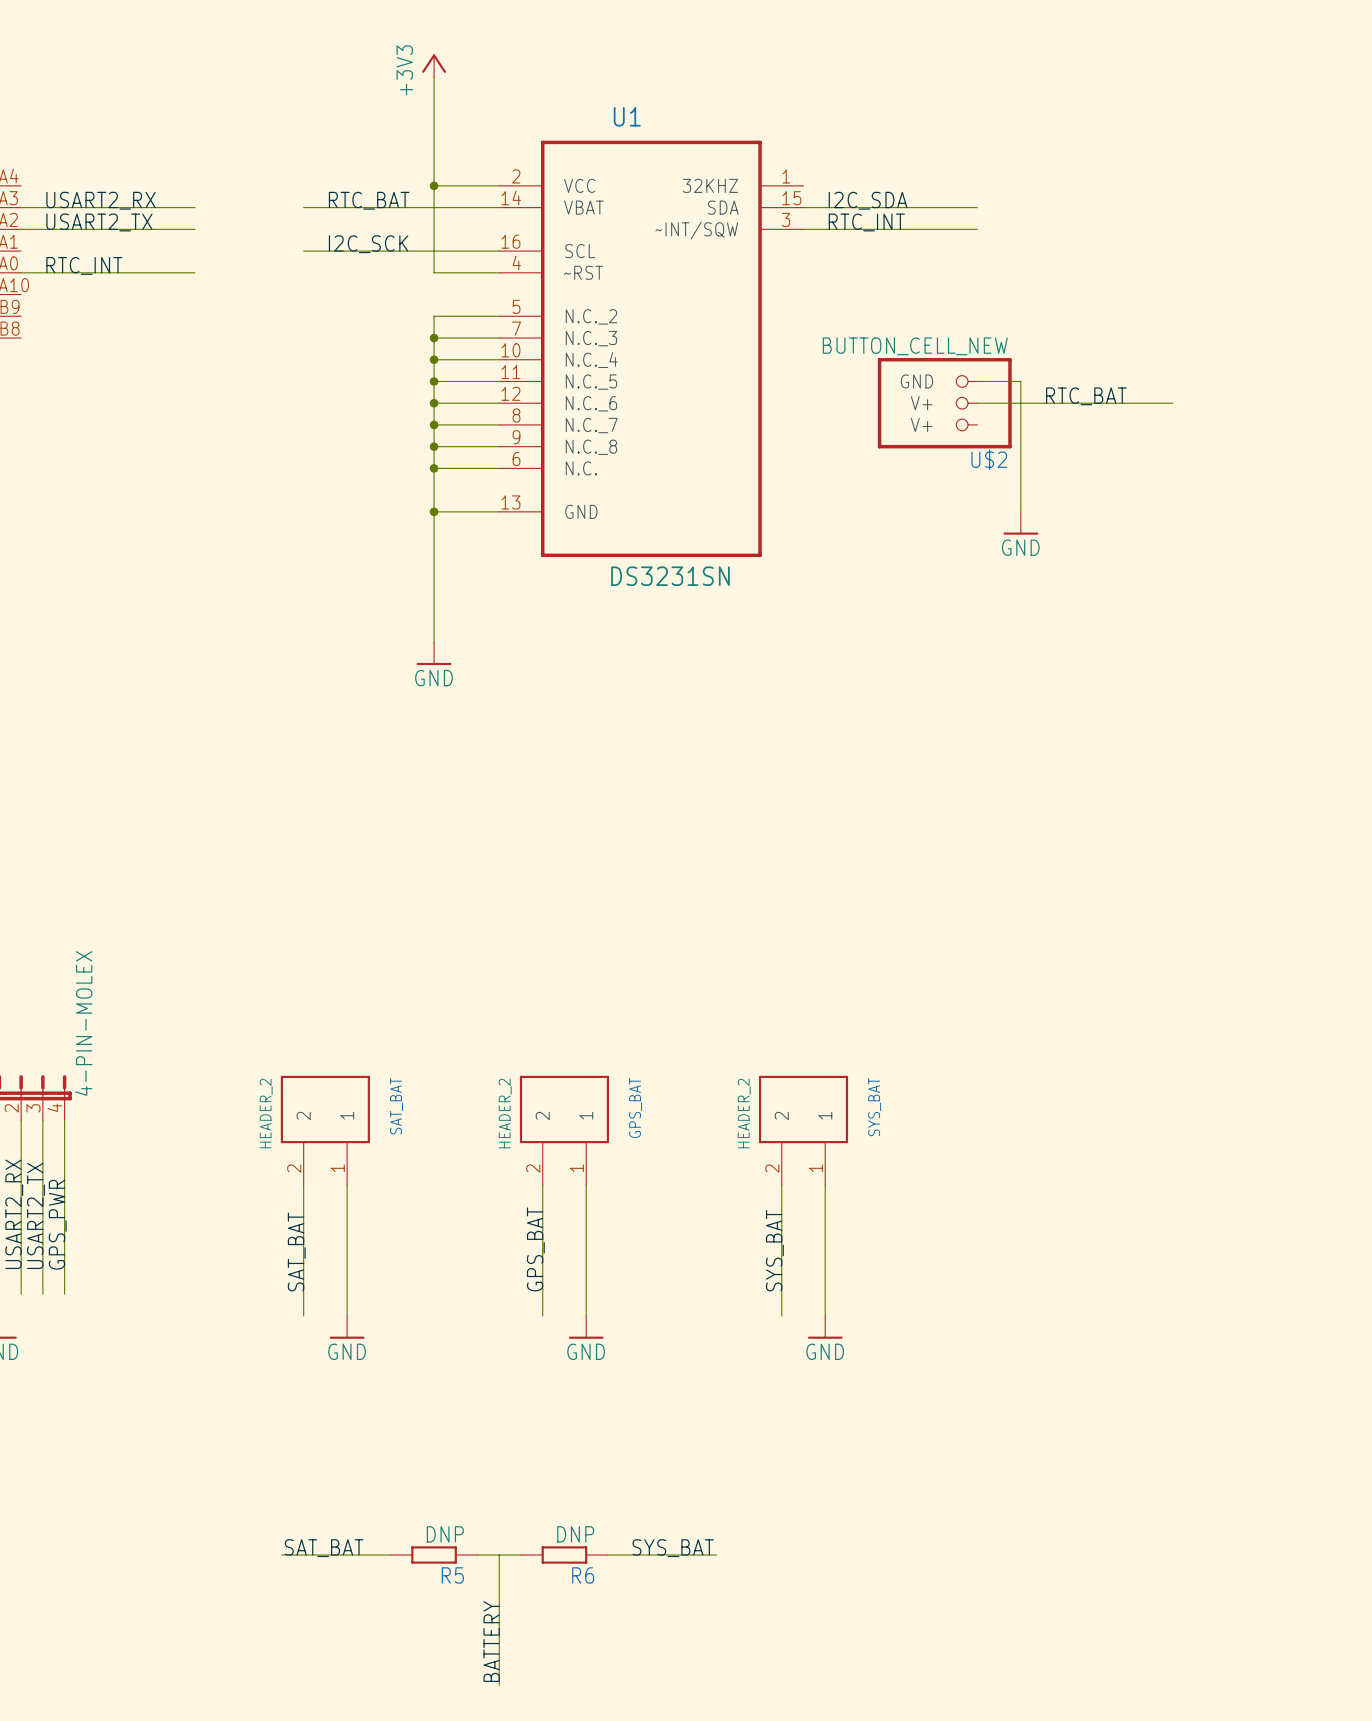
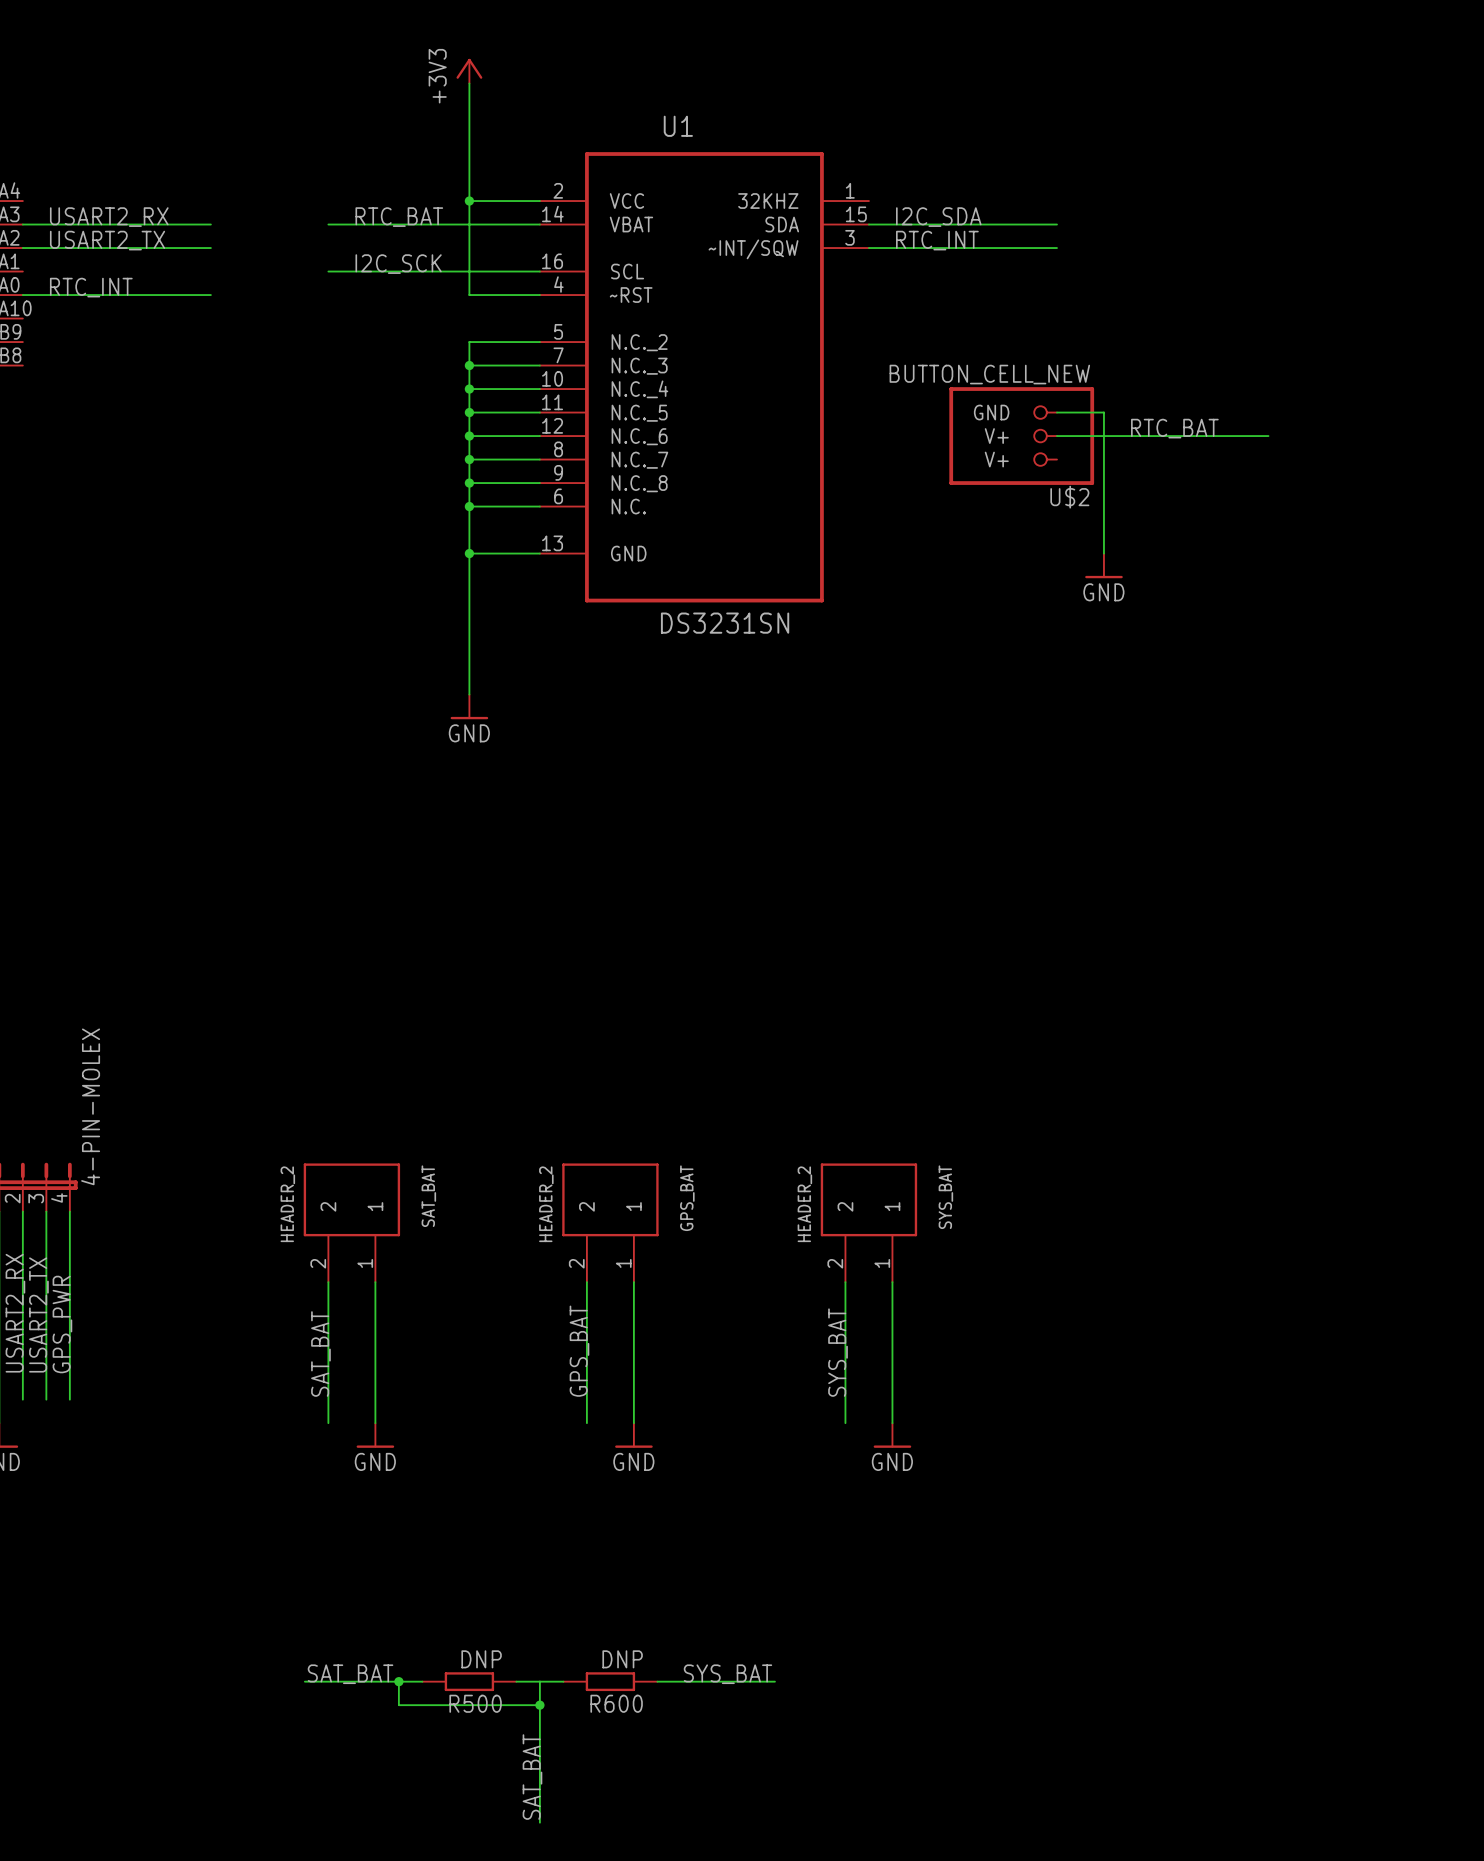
wire: none -> (398, 1681) (398, 1705) (539, 1705)
junction: none -> (398, 1681)
R5 name: R5 (452, 1575) -> R500 (475, 1703)
R6 name: R6 (583, 1575) -> R600 (616, 1703)
junction: none -> (539, 1705)
label: BATTERY (491, 1641) -> SAT_BAT (532, 1777)

